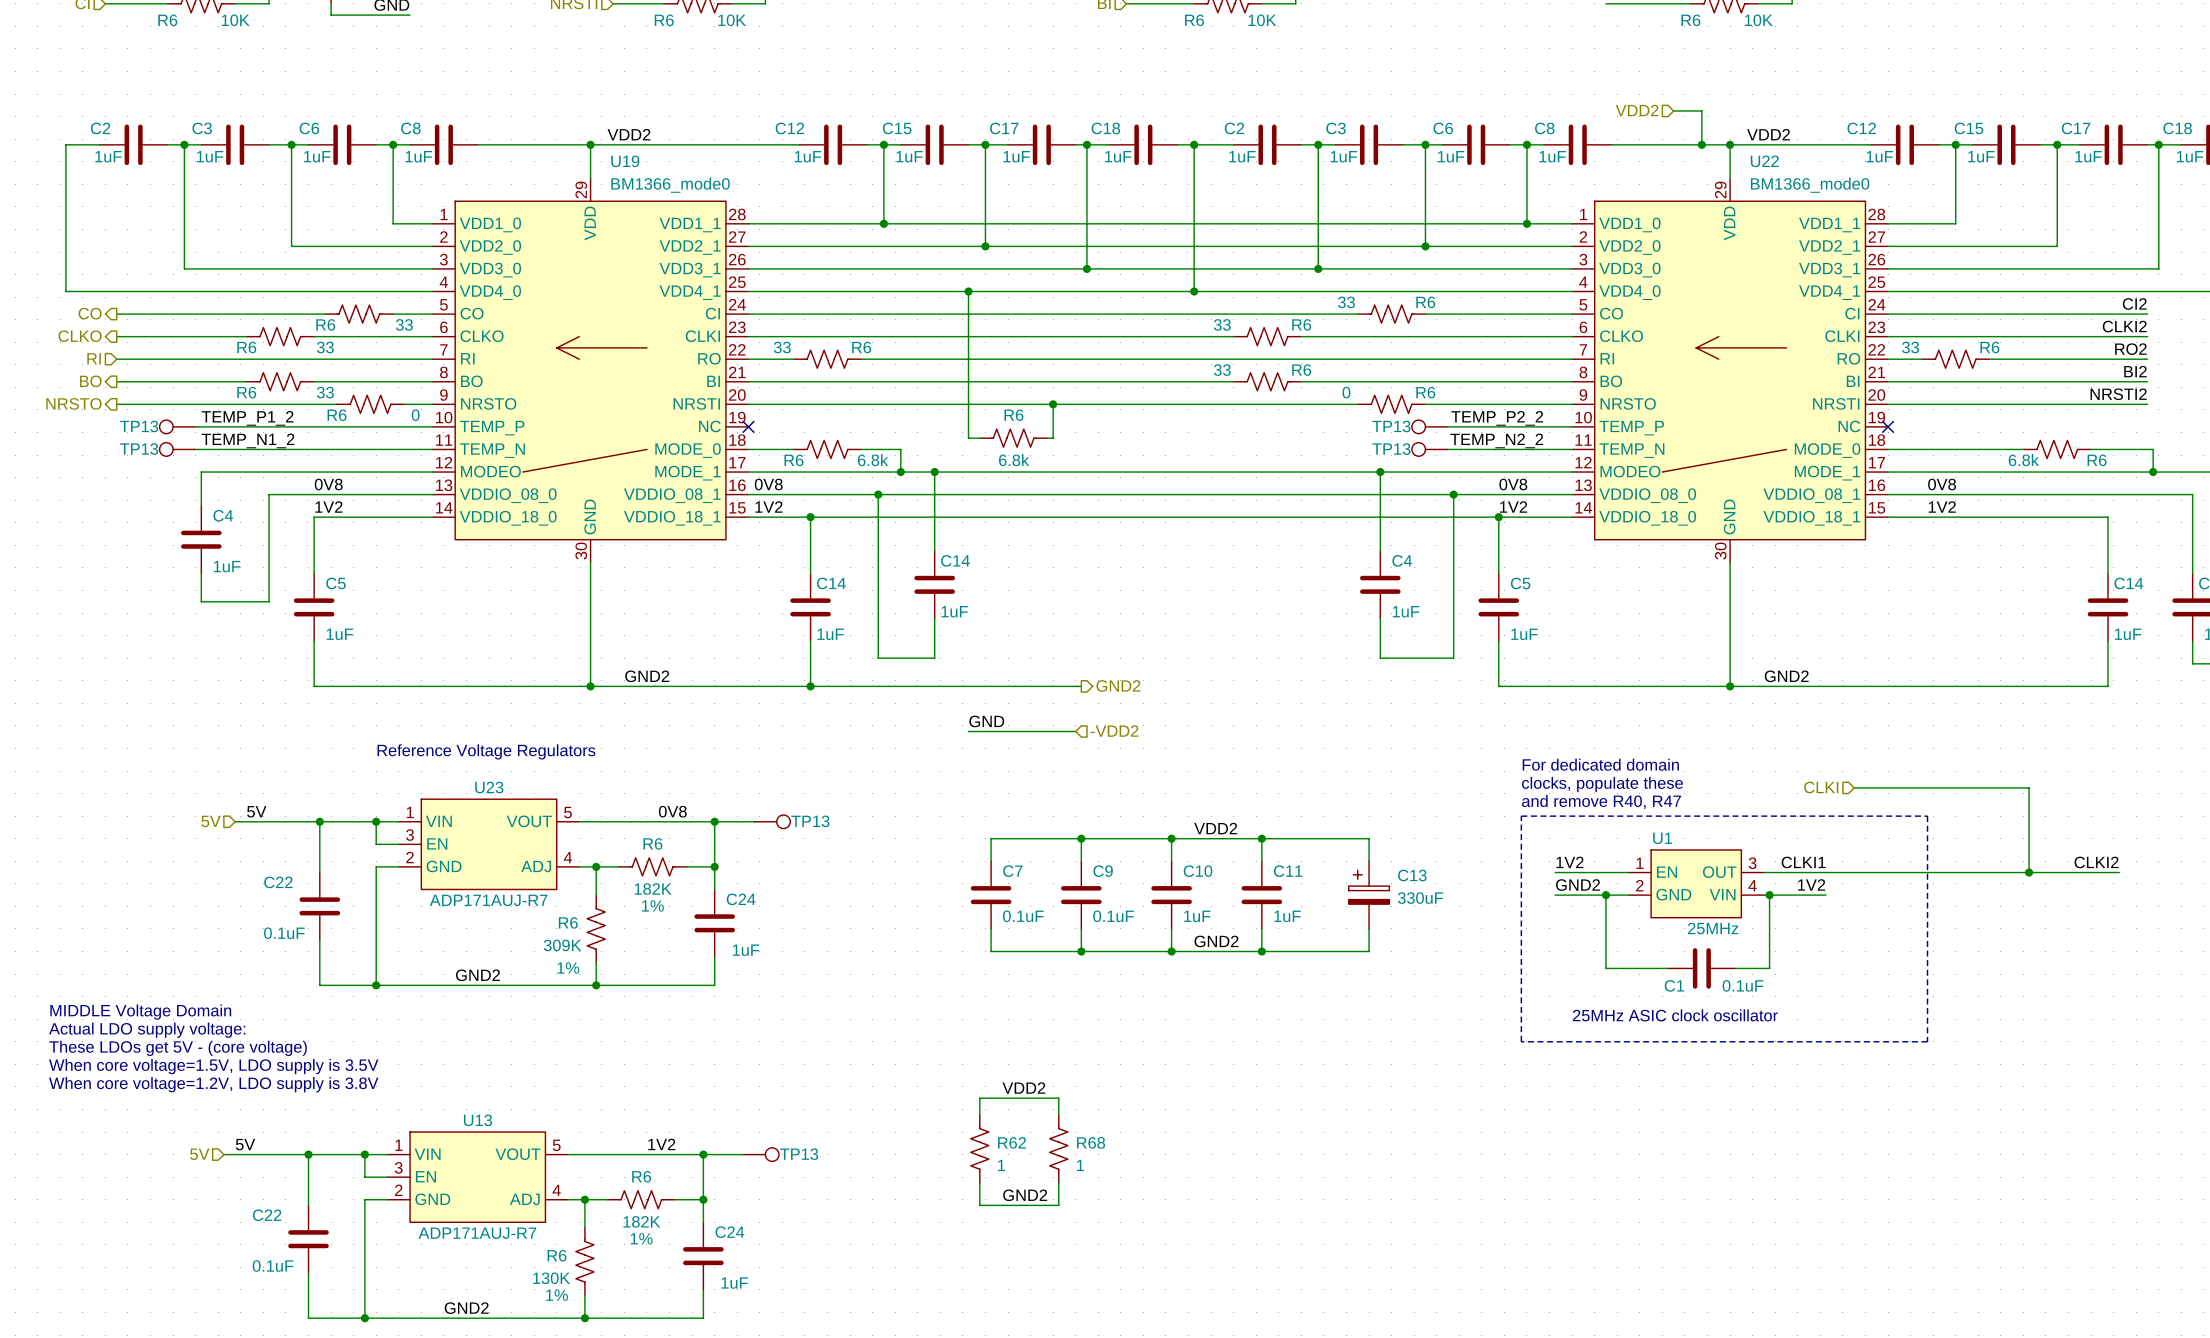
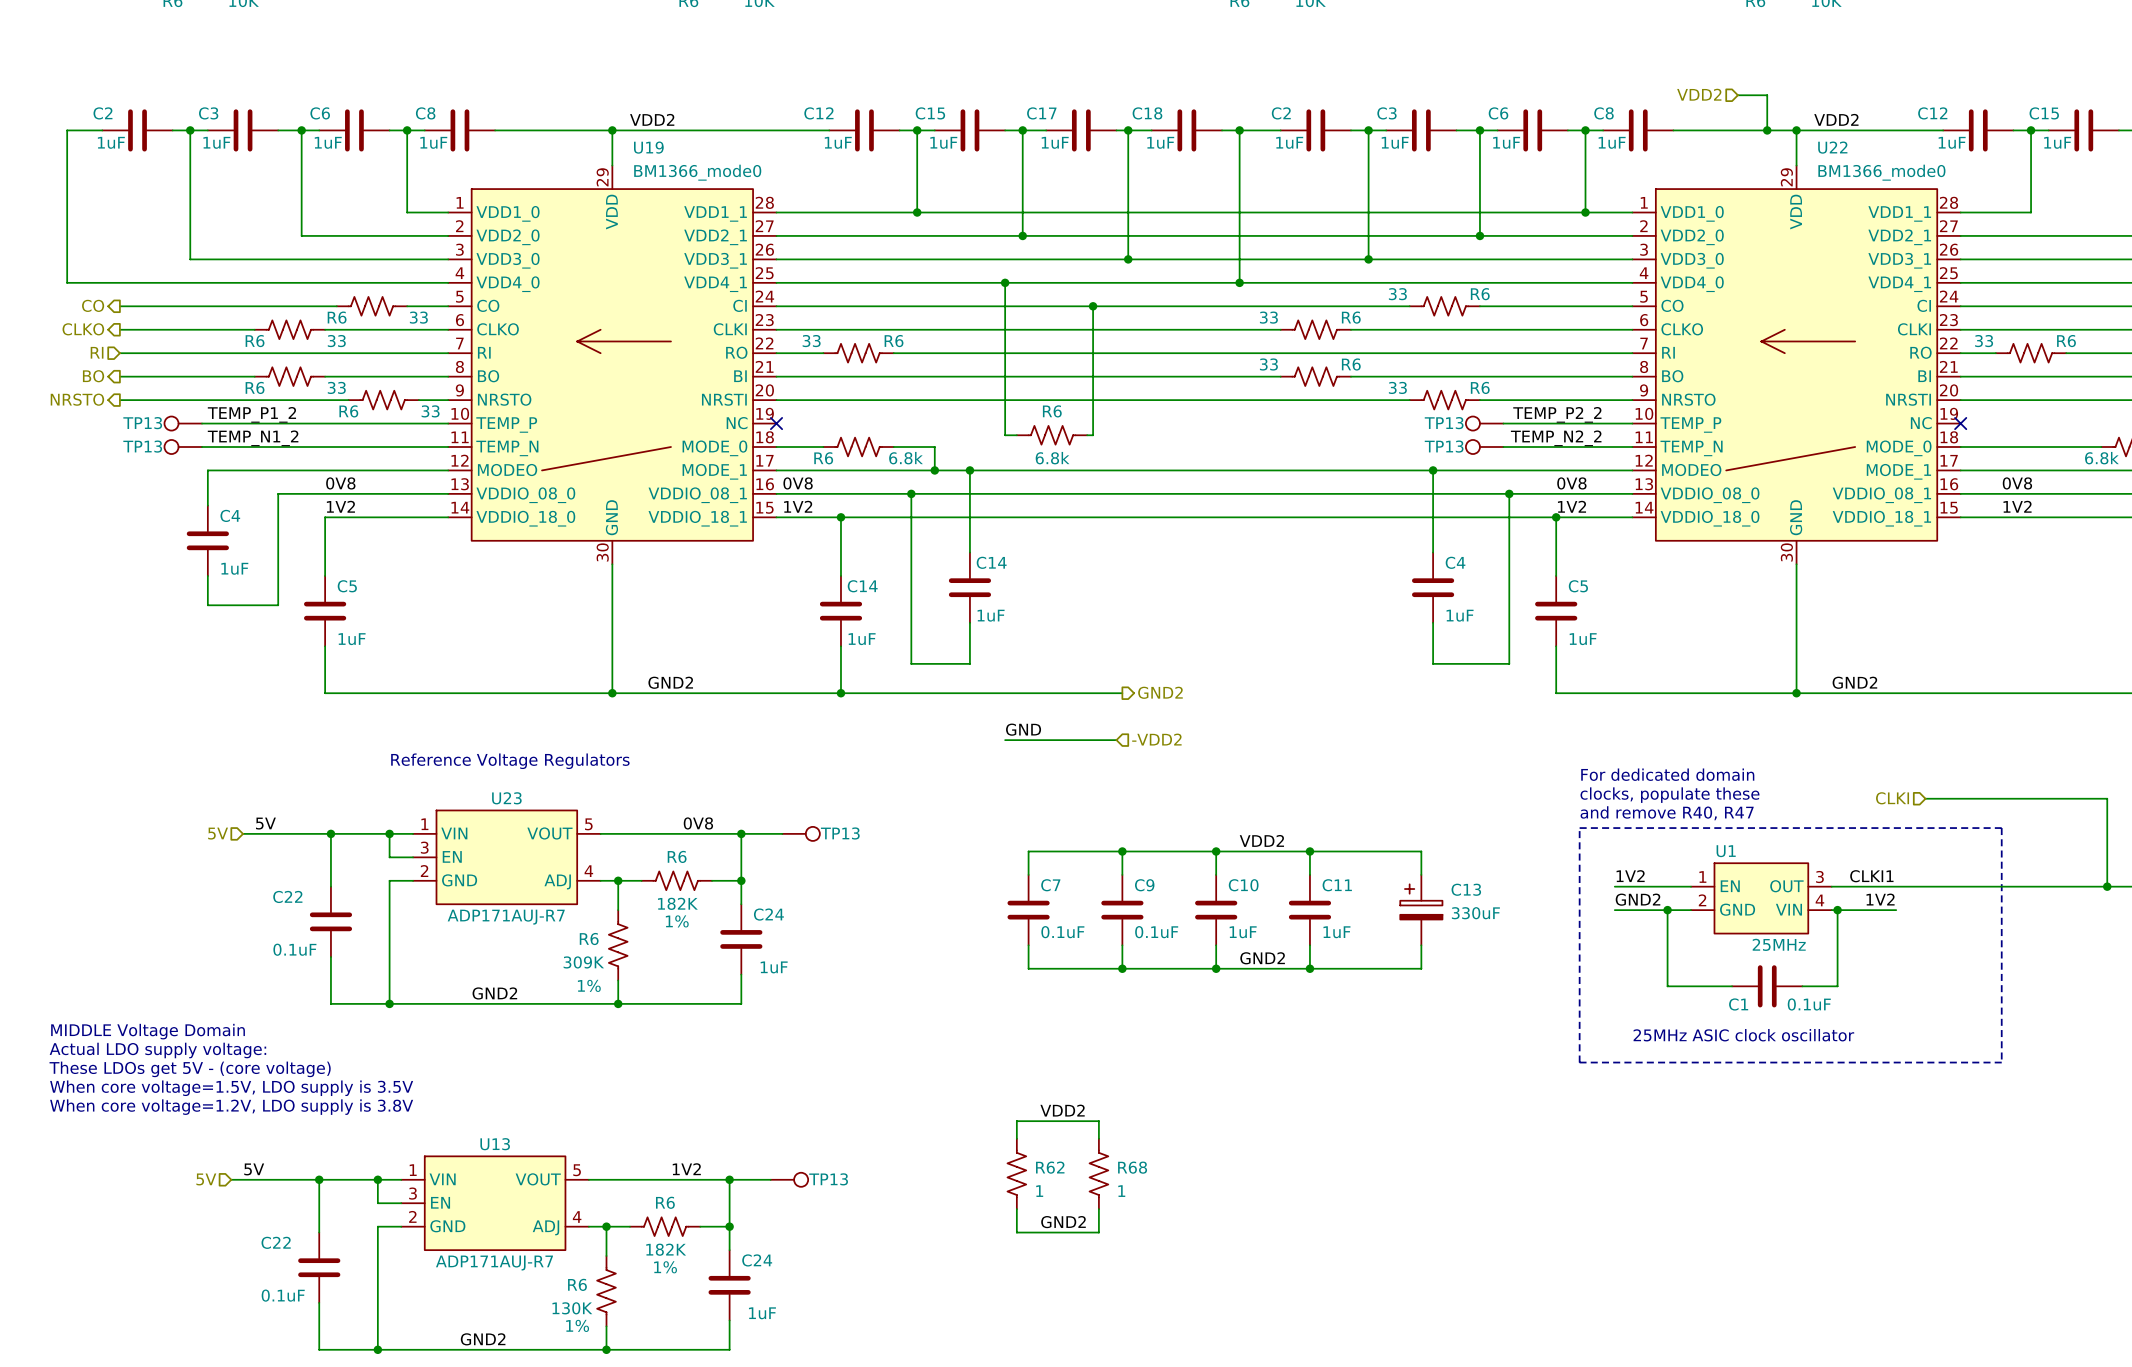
wire: none -> (1093, 306) (1093, 400)
junction: none -> (1093, 306)
R6 value: 0 (1346, 392) -> 33 (1397, 387)
junction: (1053, 404) -> none
R6 value: 0 (415, 415) -> 33 (430, 411)

